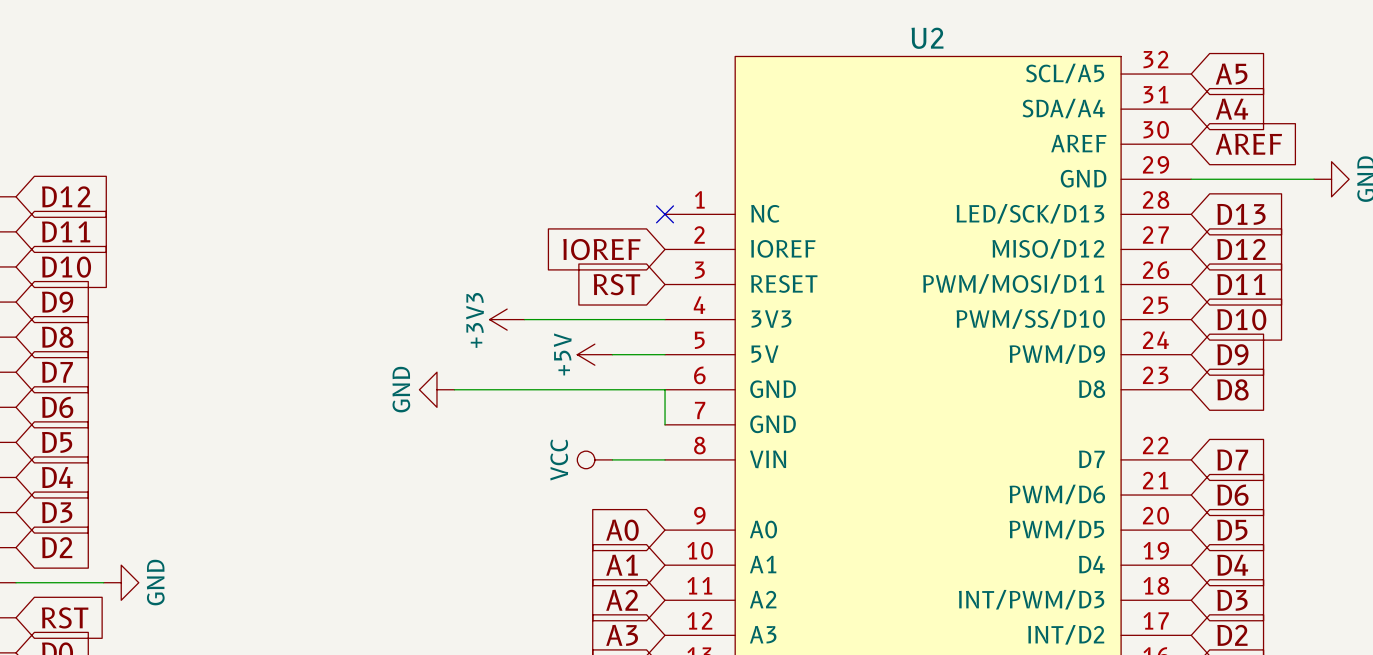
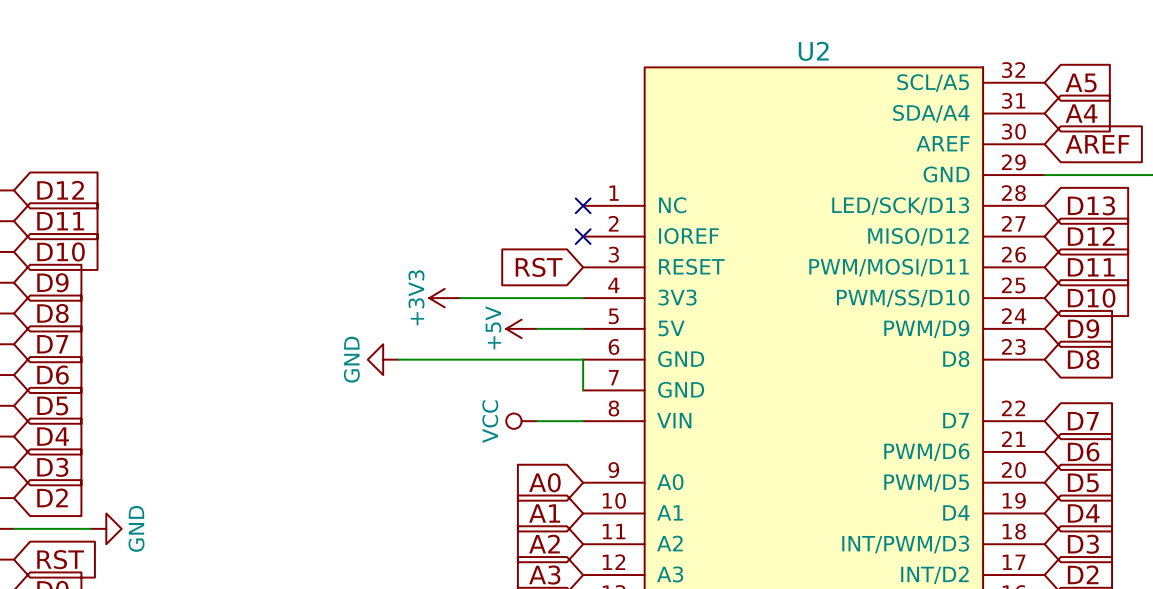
global label: IOREF (601, 249) -> none
no-connect mark: none -> (583, 236)

